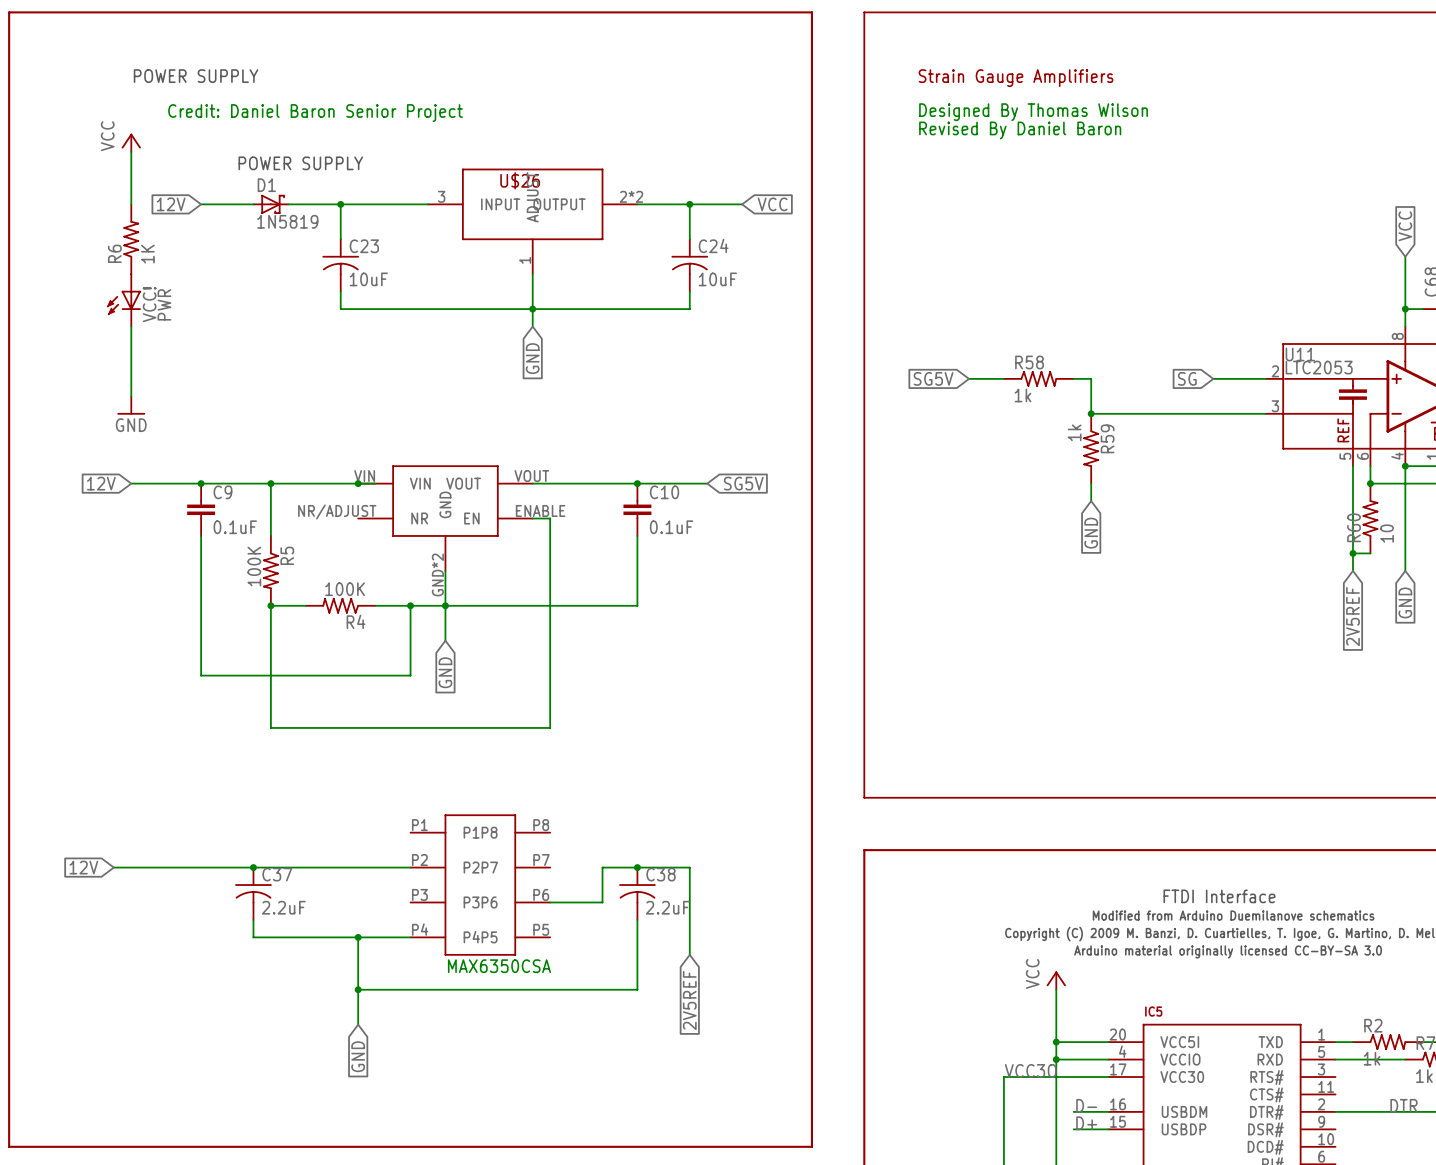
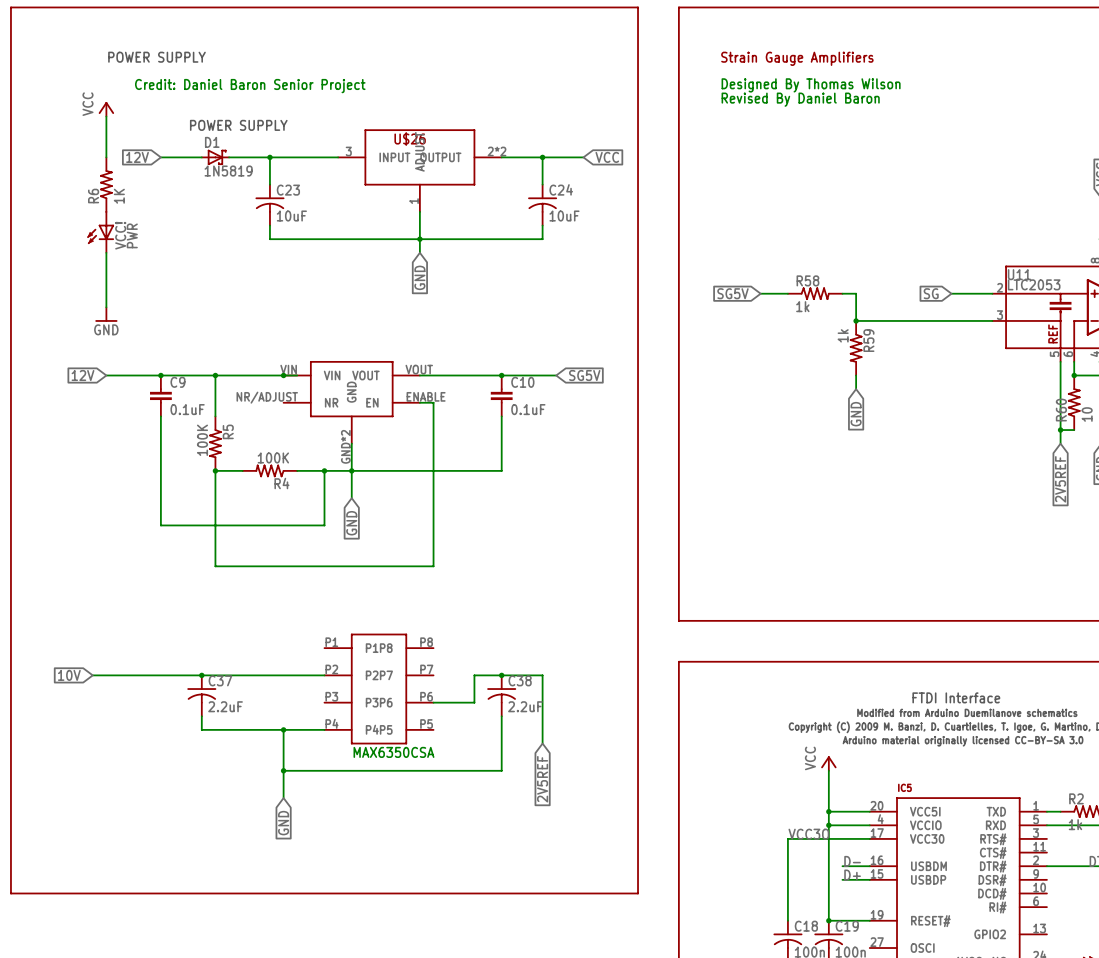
global label: 12V (83, 867) -> 10V (69, 675)

